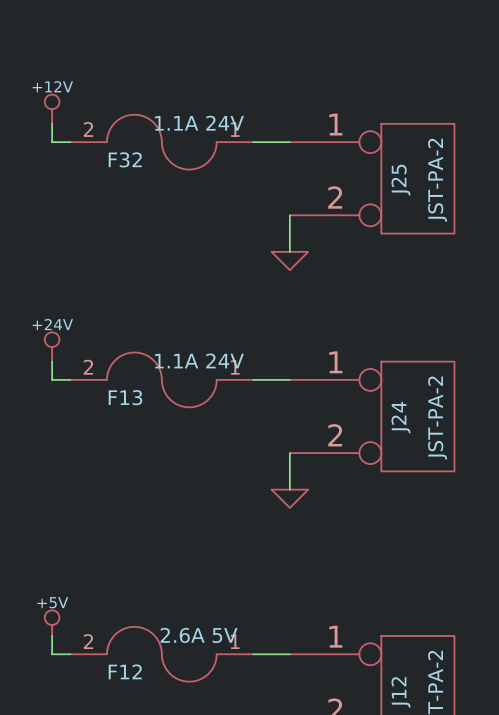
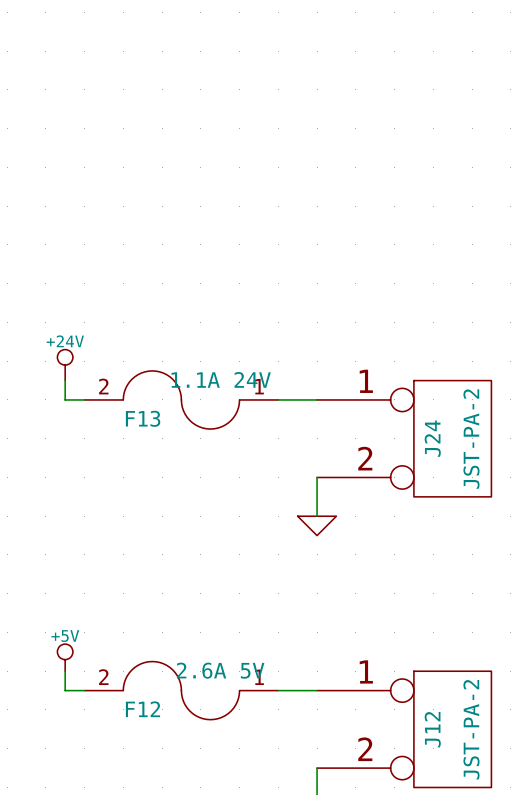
power symbol: +12V (52, 109) -> none
wire: (52, 123) (52, 142) (70, 142) -> none
F32: 1.1A 24V (161, 142) -> none
wire: (253, 142) (289, 142) -> none
J25: JST-PA-2 (372, 178) -> none
wire: (289, 215) (289, 251) -> none
power symbol: (289, 261) -> none

